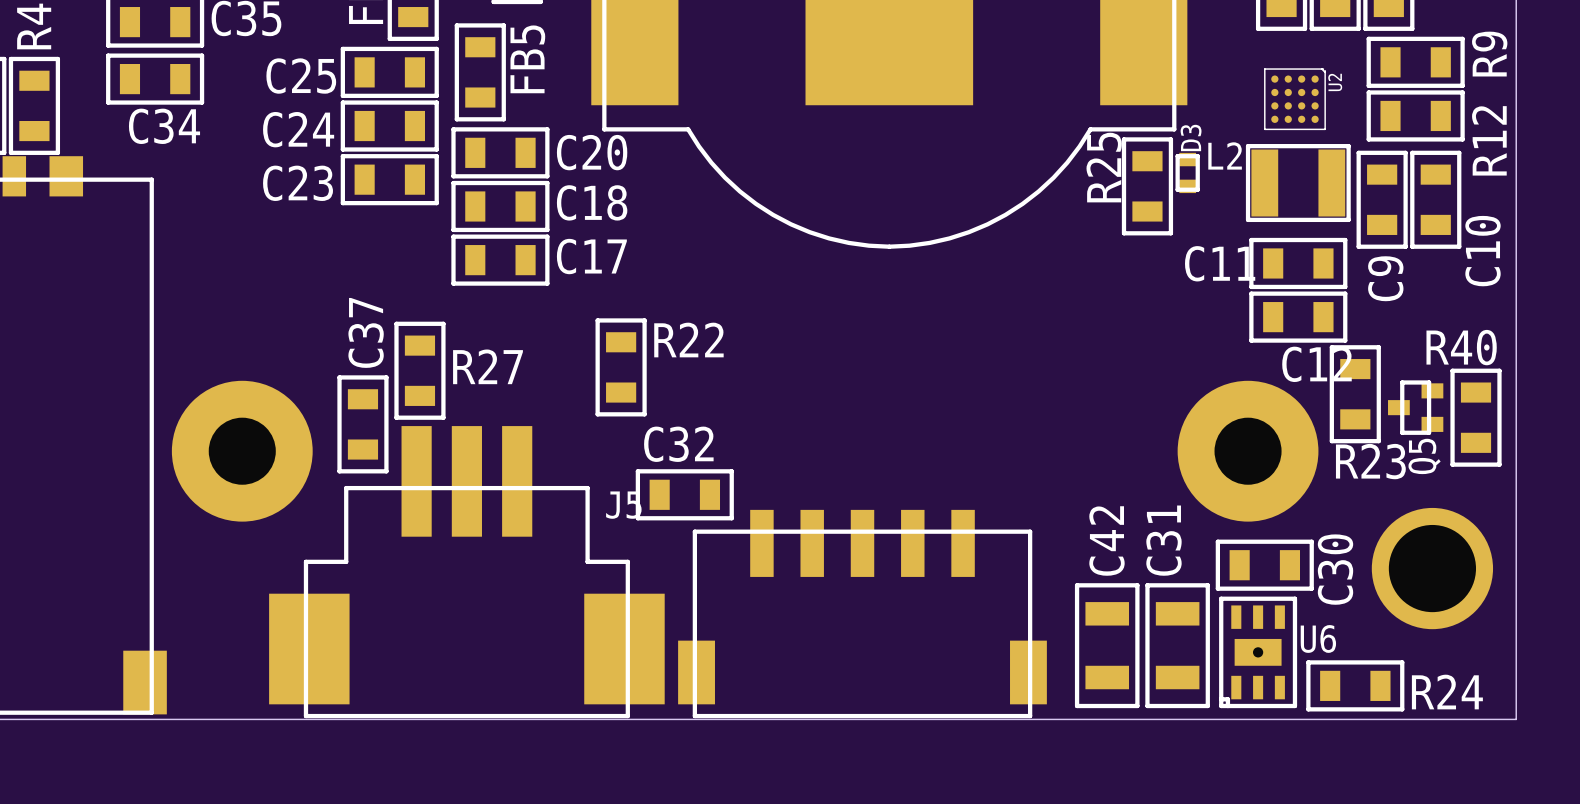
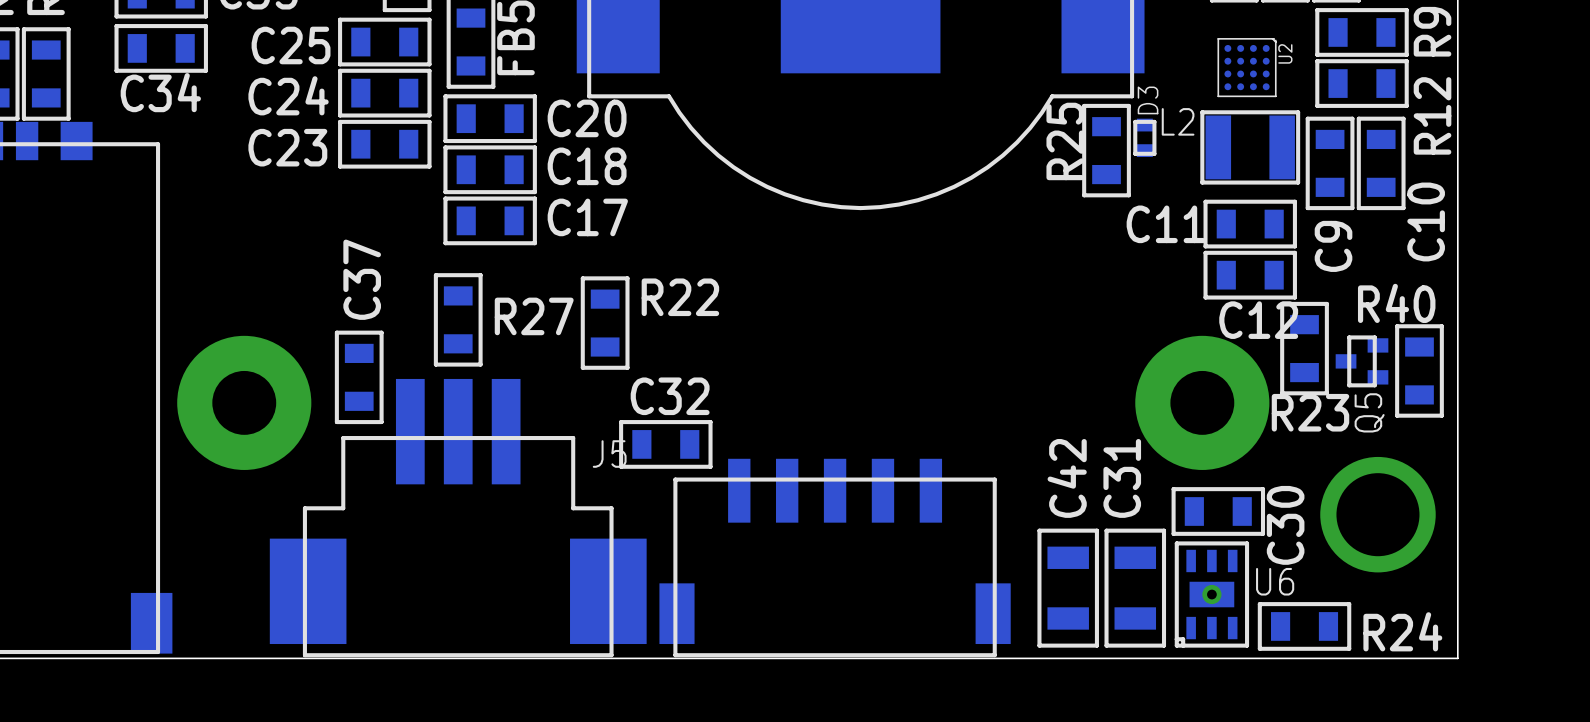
R27 position: (419, 370) -> (458, 319)

